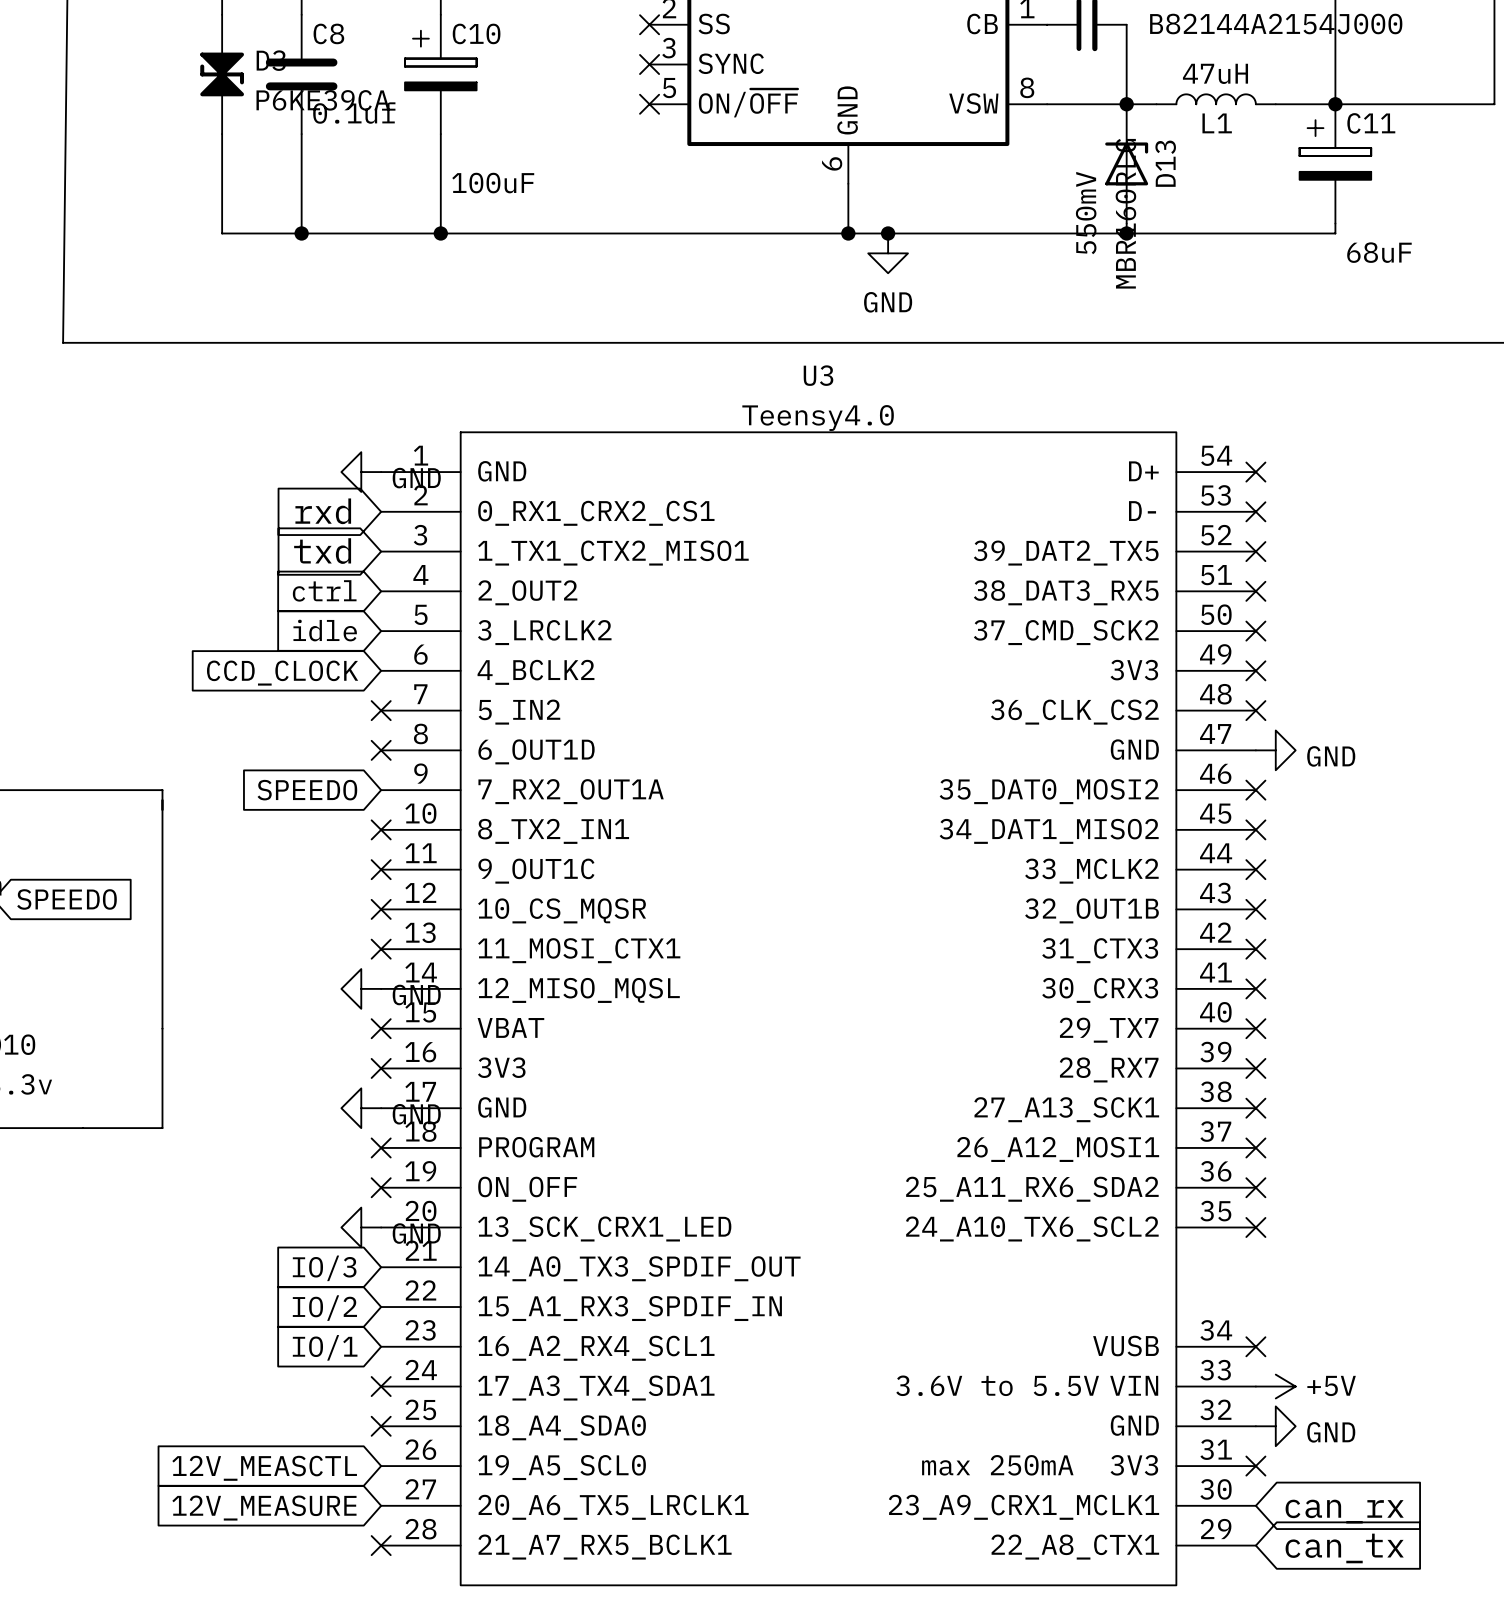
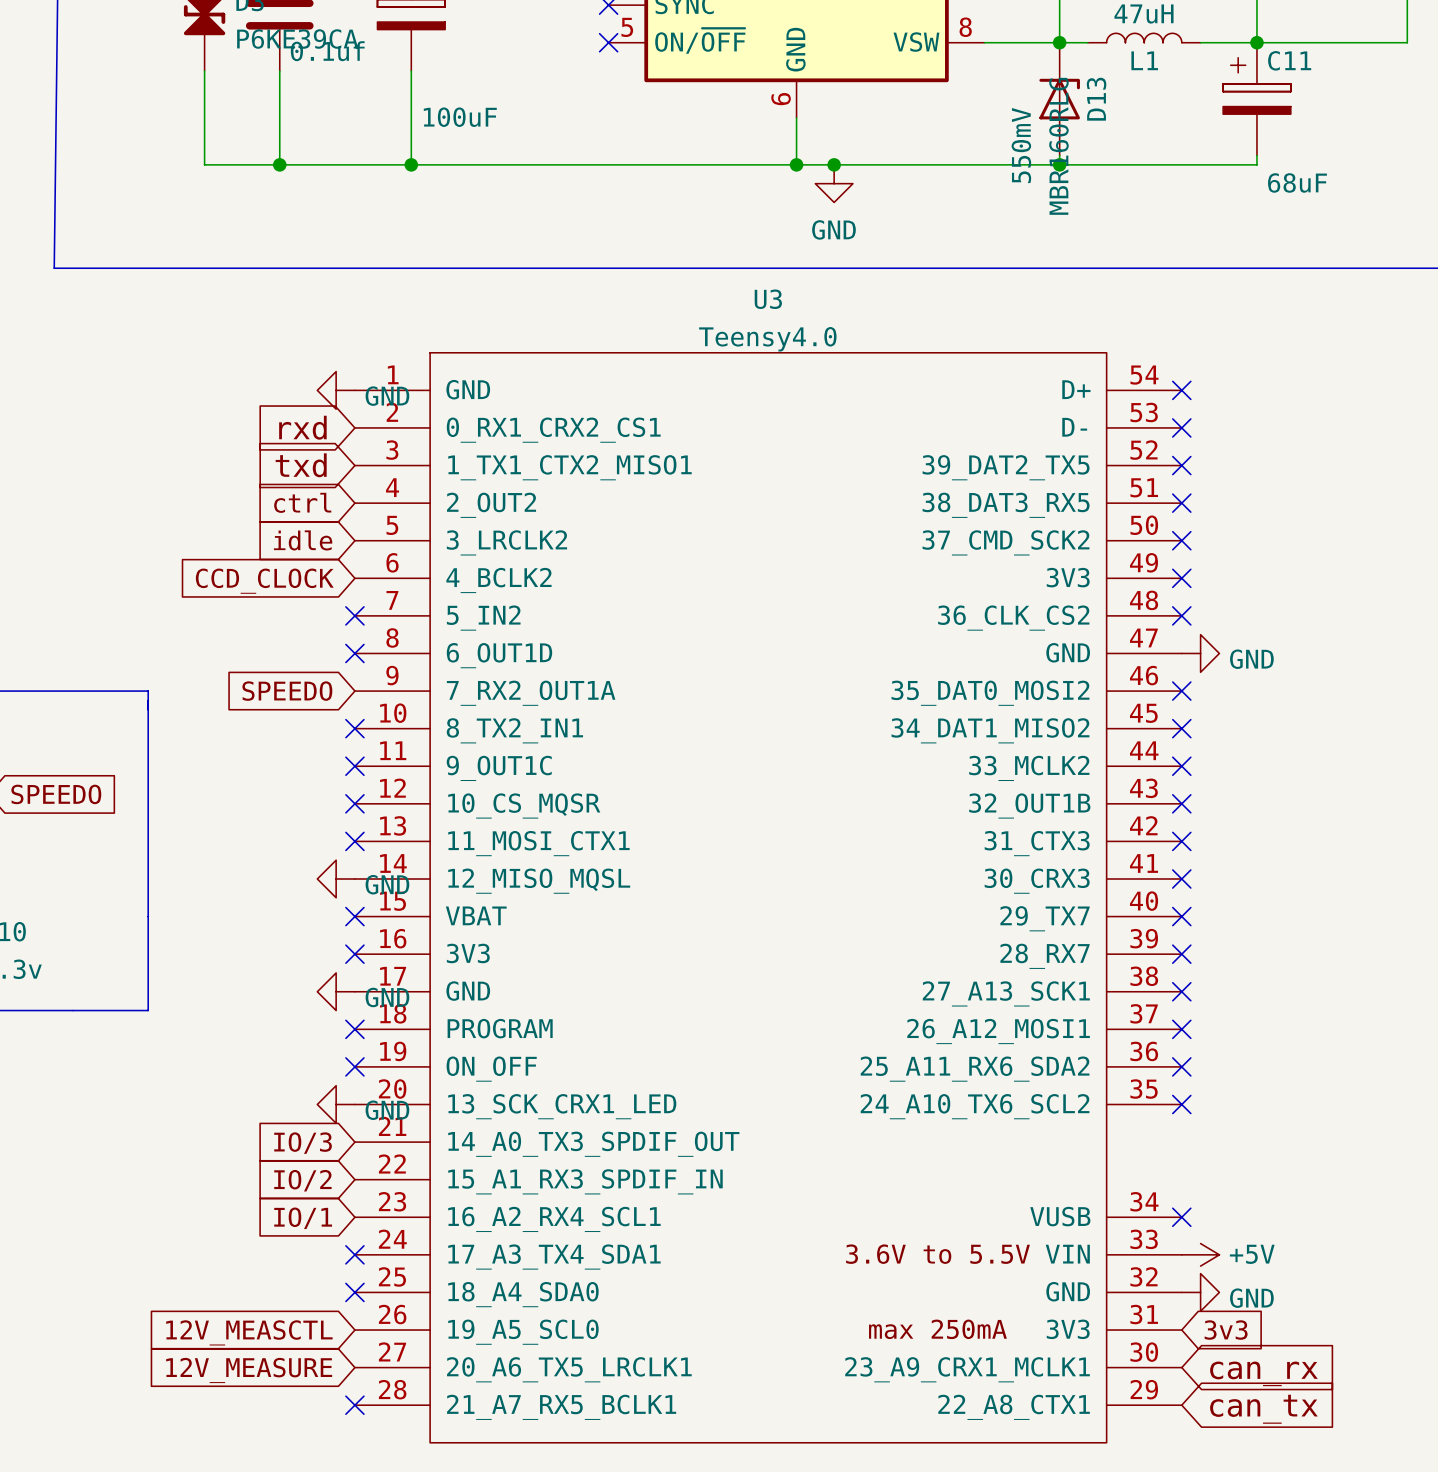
no-connect mark: (1255, 1466) -> none
global label: none -> 3v3 (1226, 1330)

